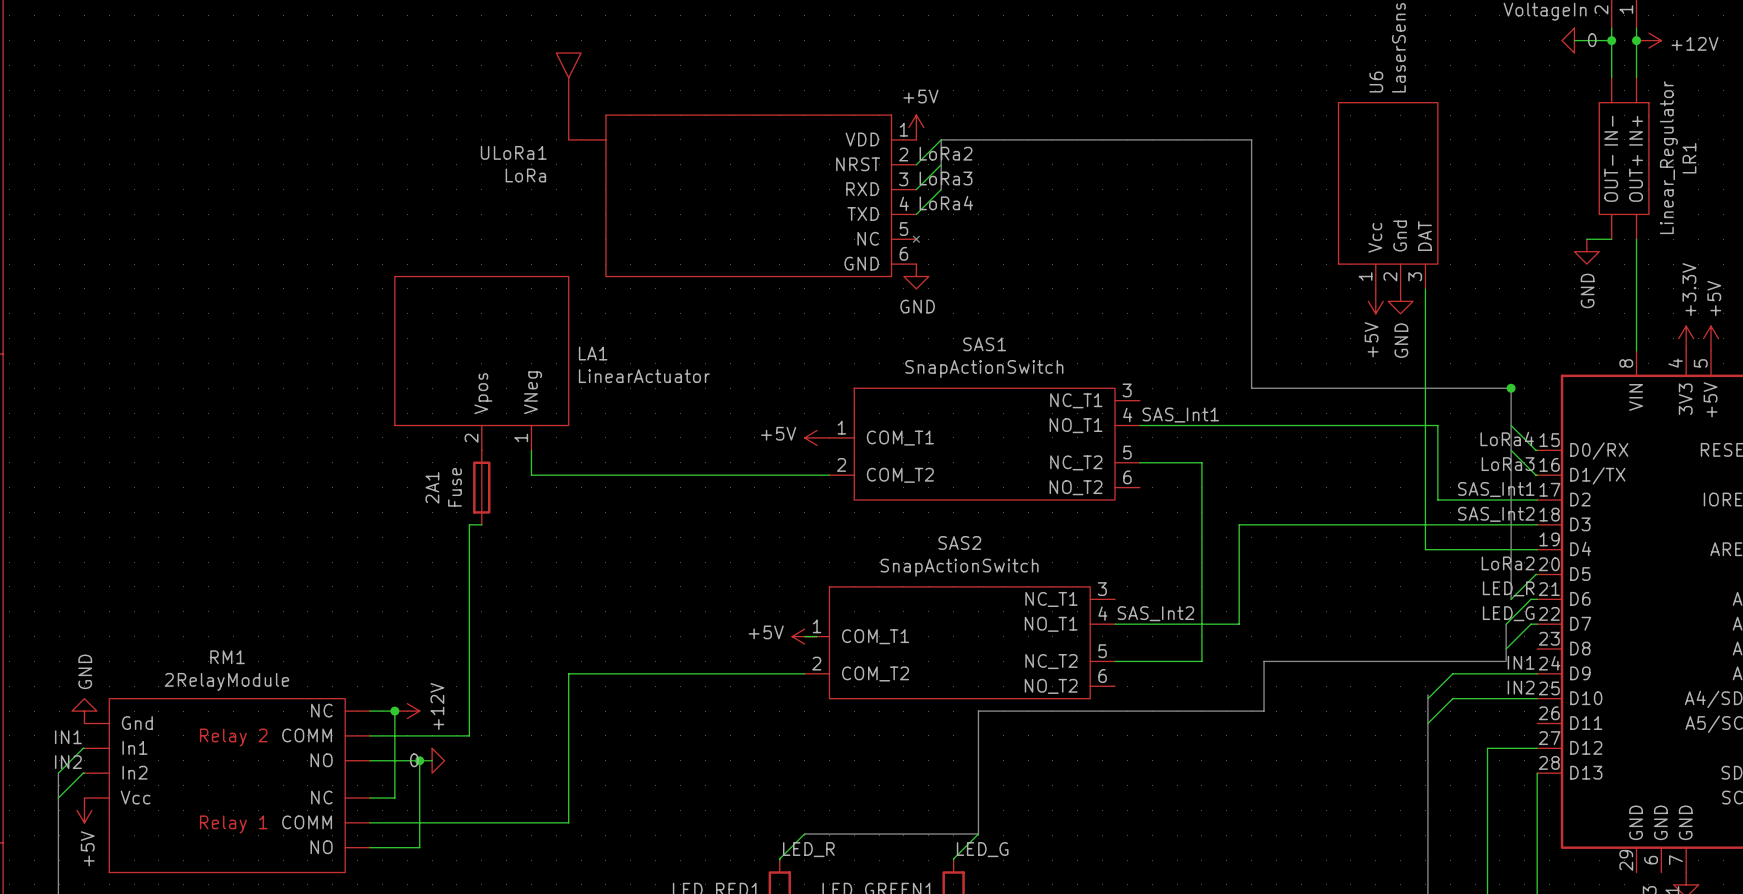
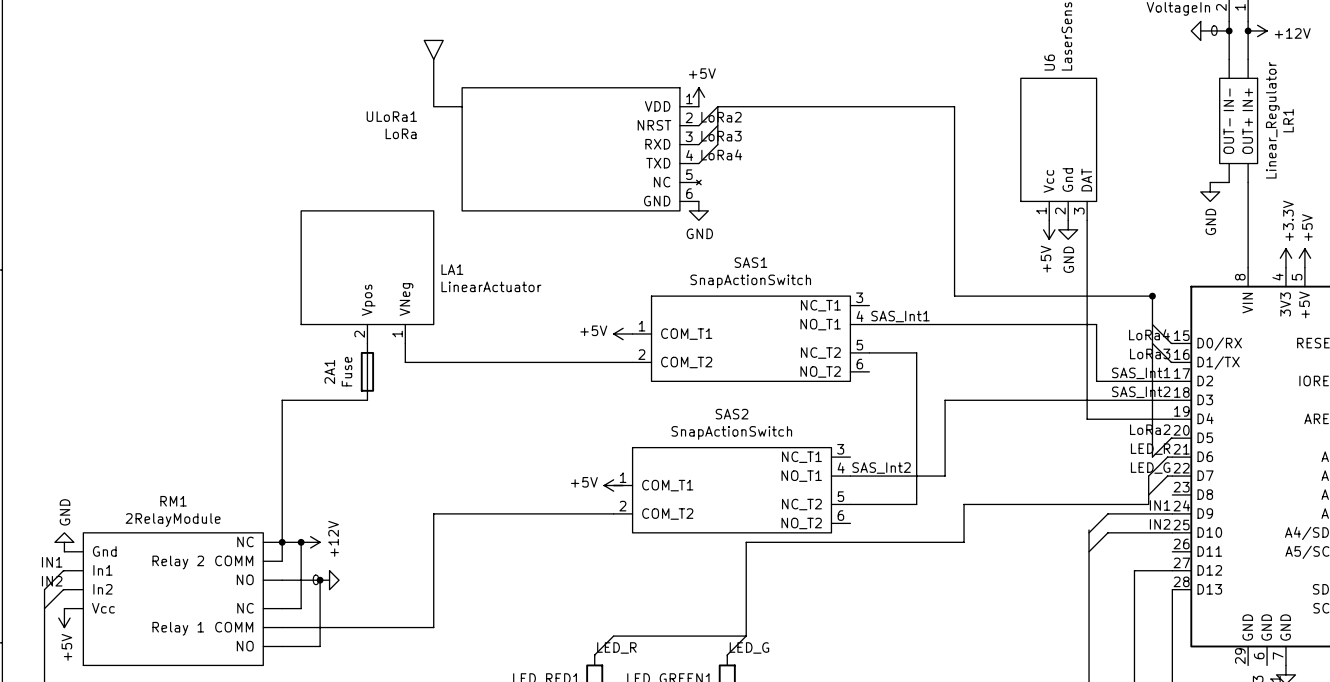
wire: (469, 524) (469, 735) (370, 735) -> (357, 400) (282, 400) (282, 561)
junction: none -> (282, 542)

